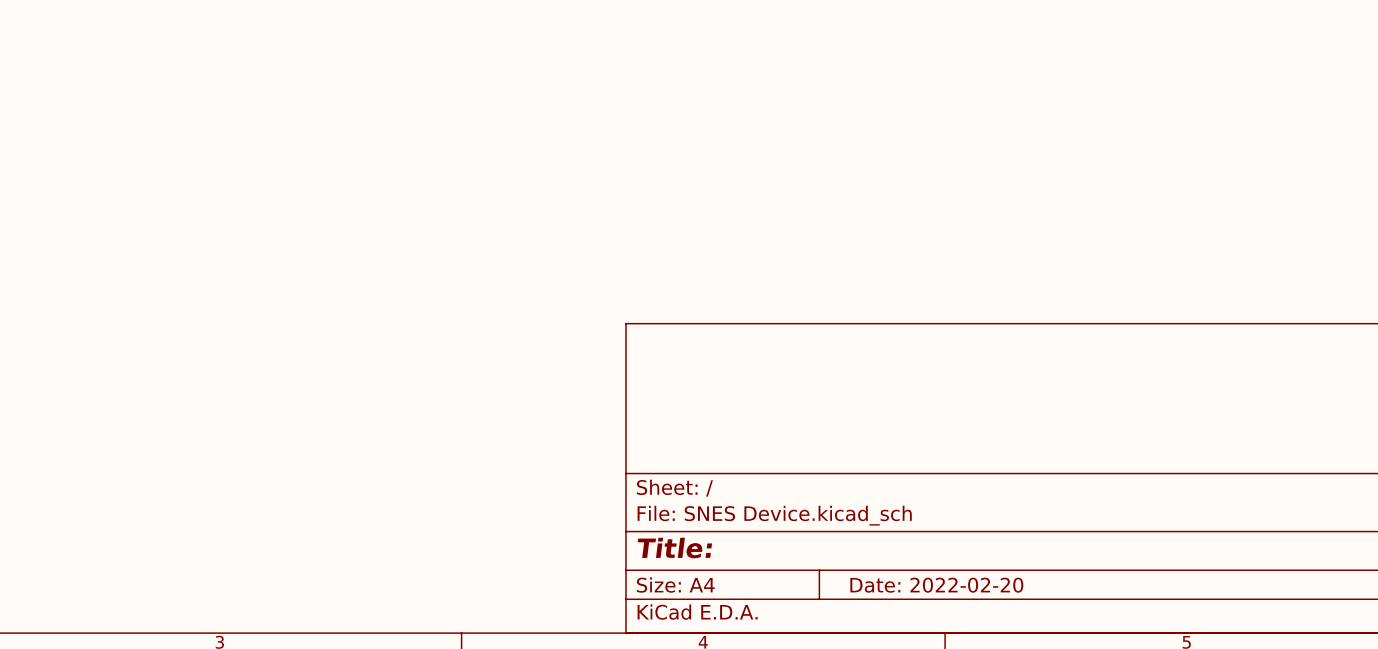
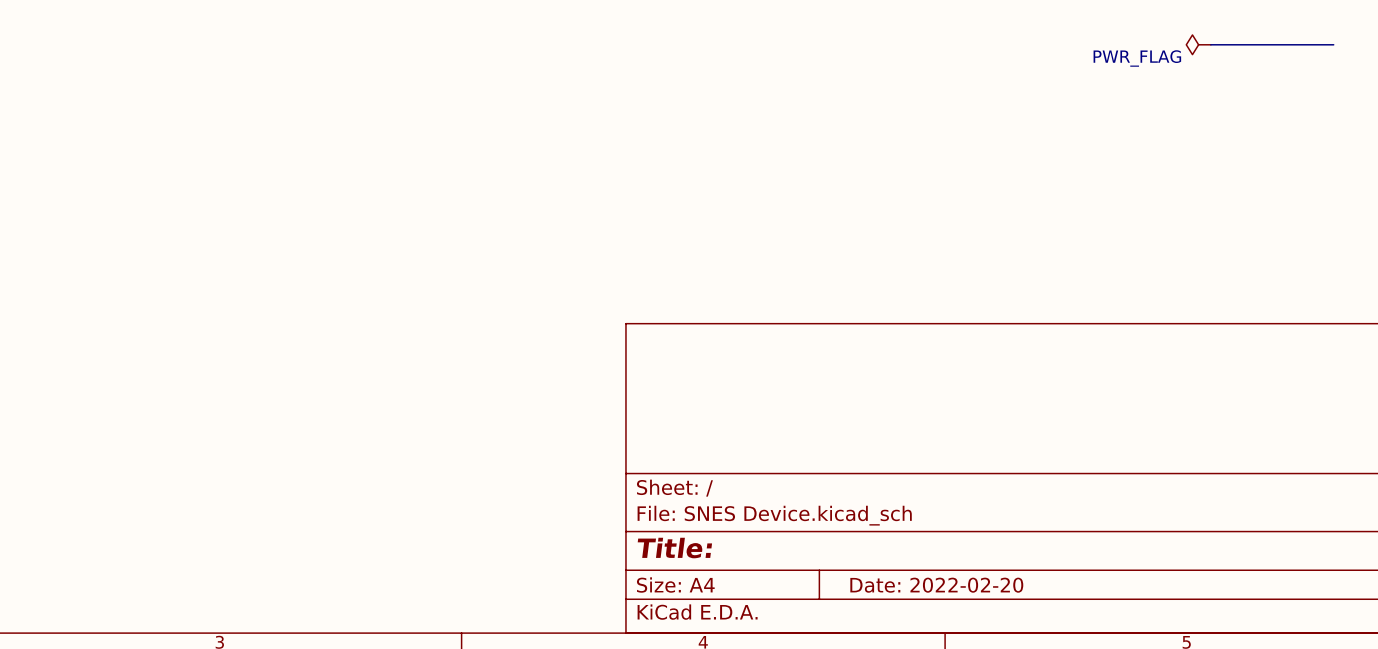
power symbol: none -> PWR_FLAG (1198, 44)
wire: none -> (1210, 44) (1333, 44)

